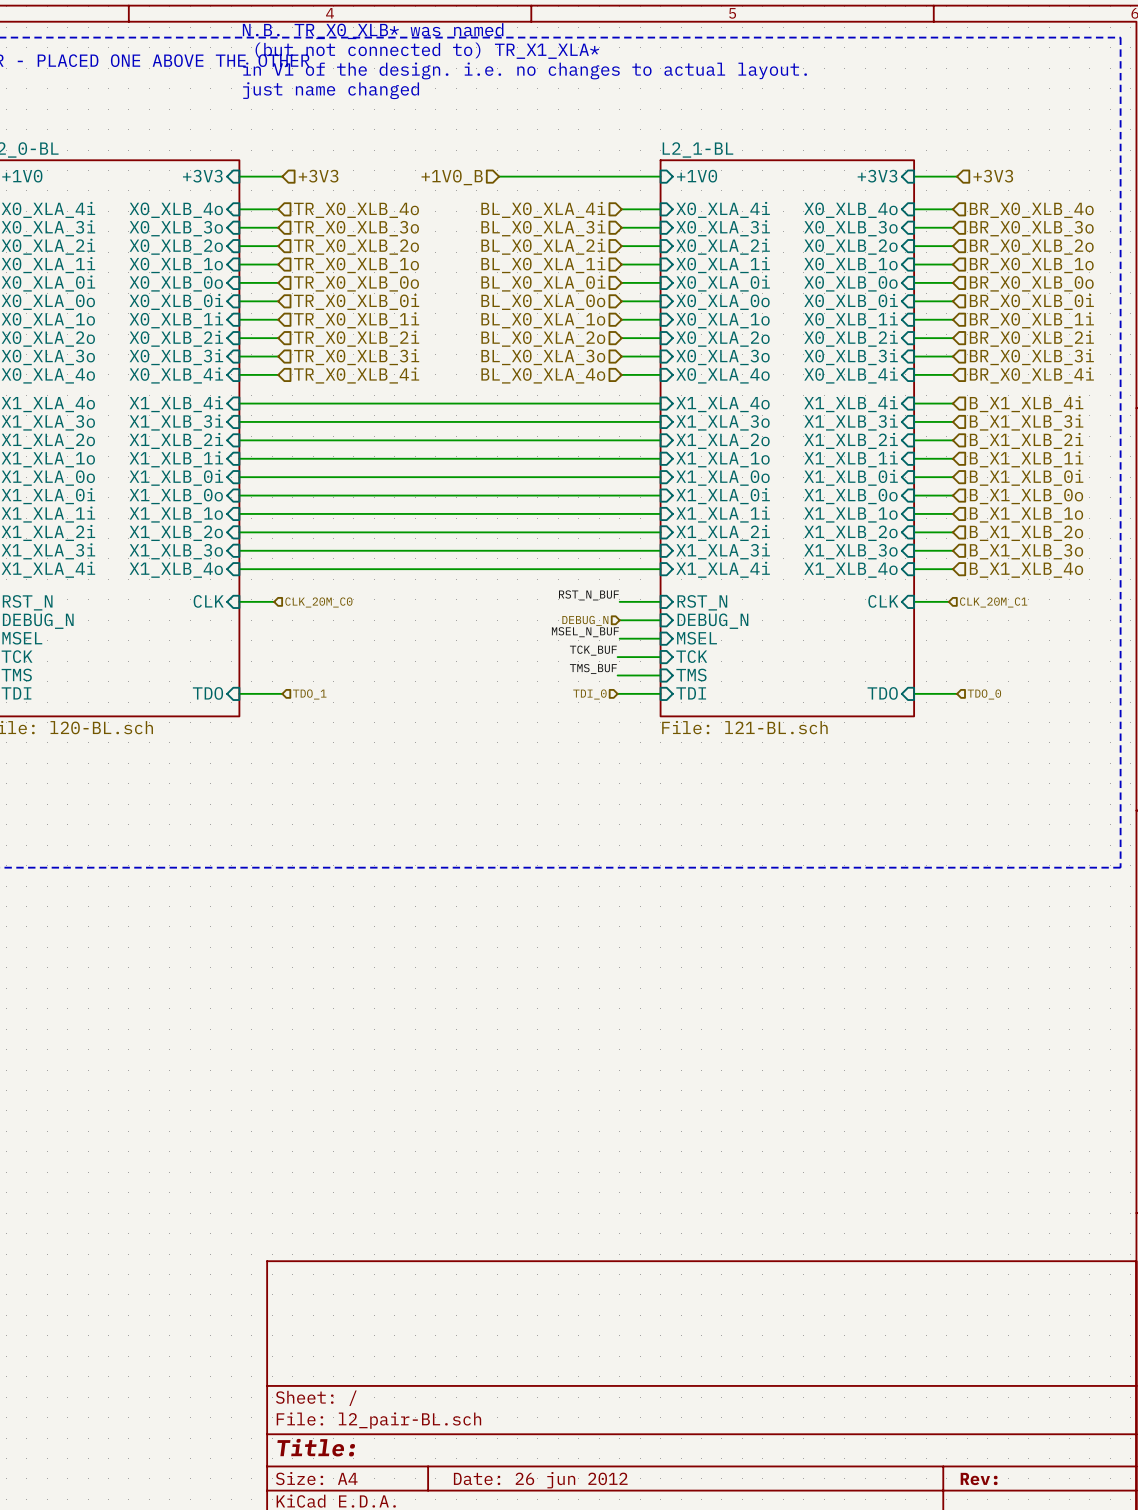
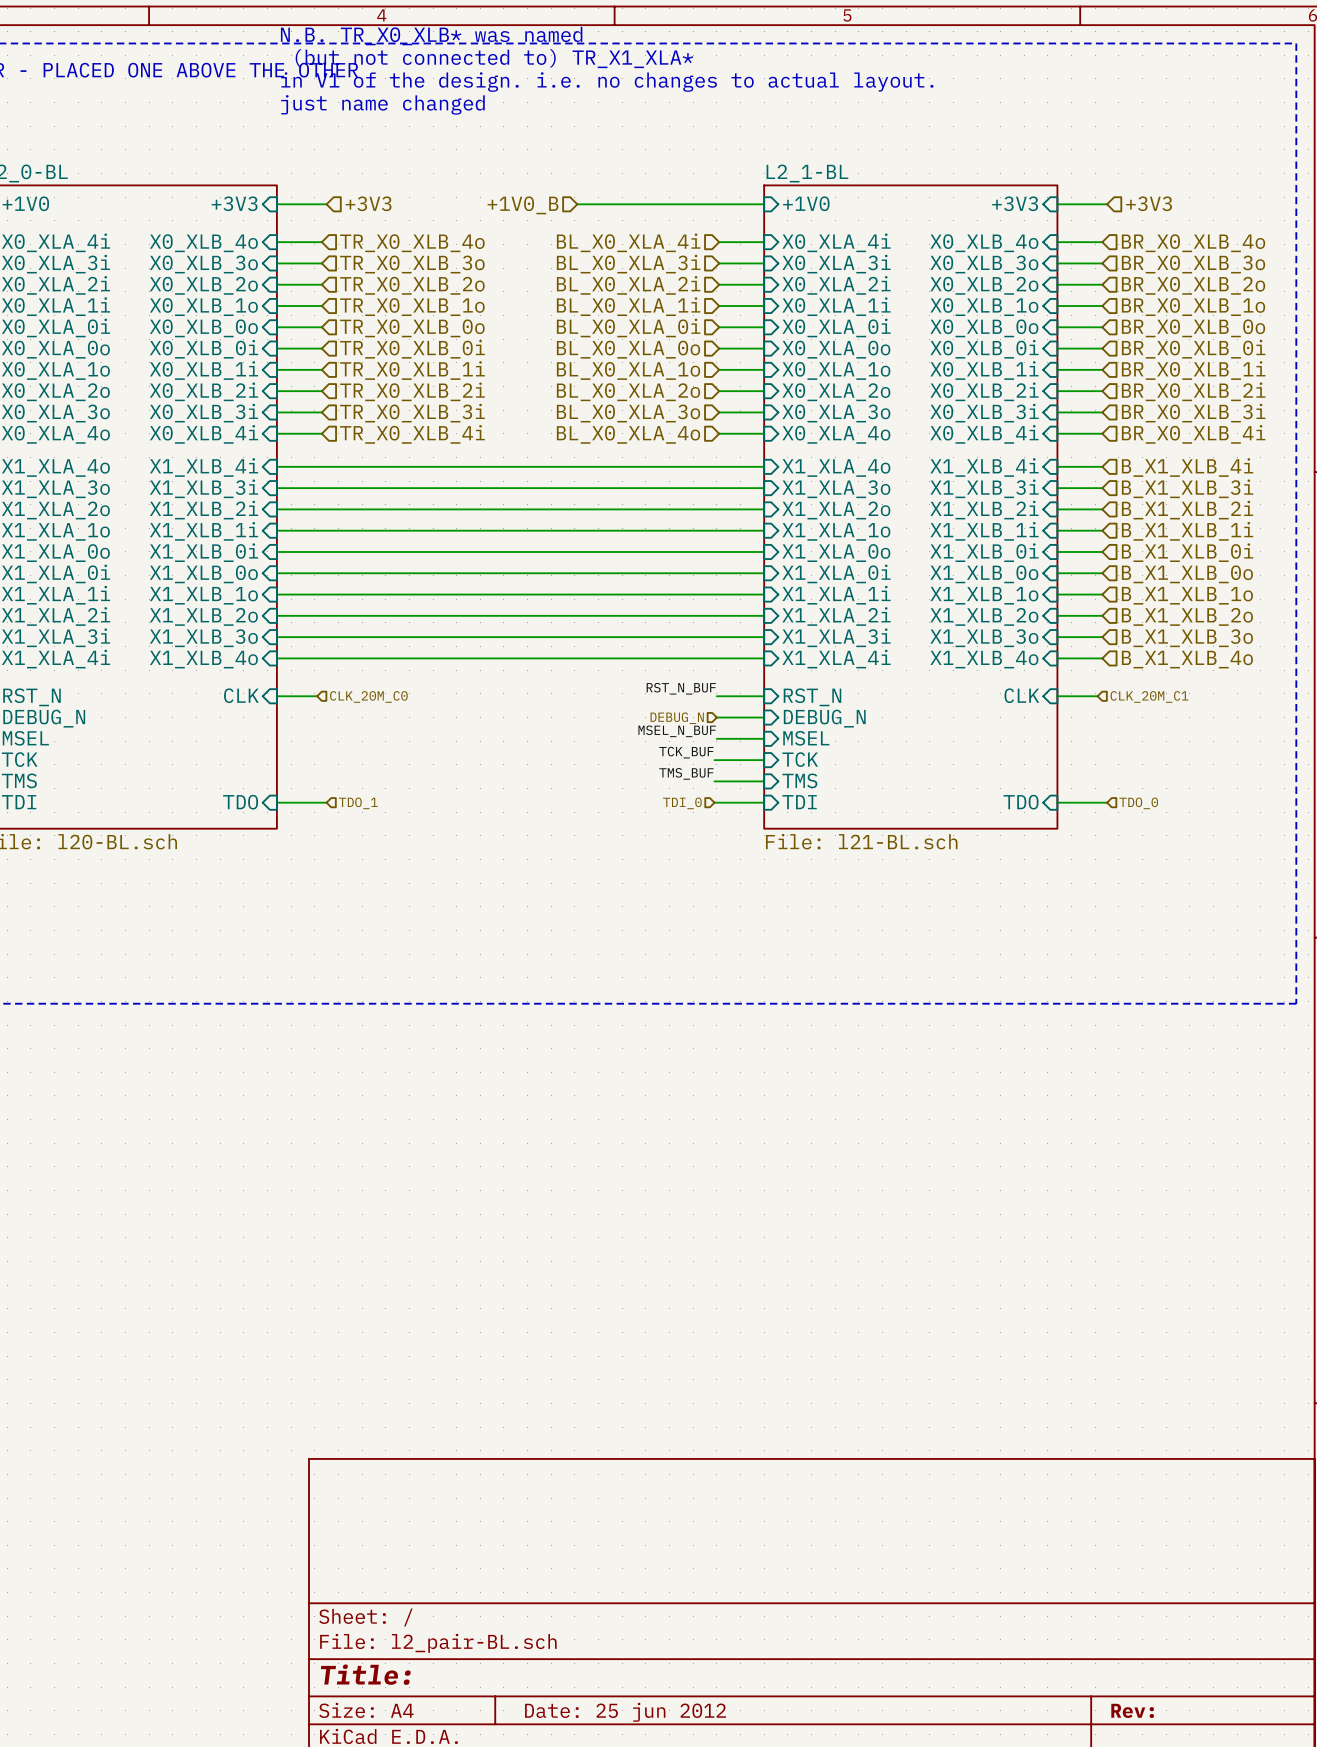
title block: Date: 26 jun 2012 (540, 1480) -> Date: 25 jun 2012 (625, 1712)

